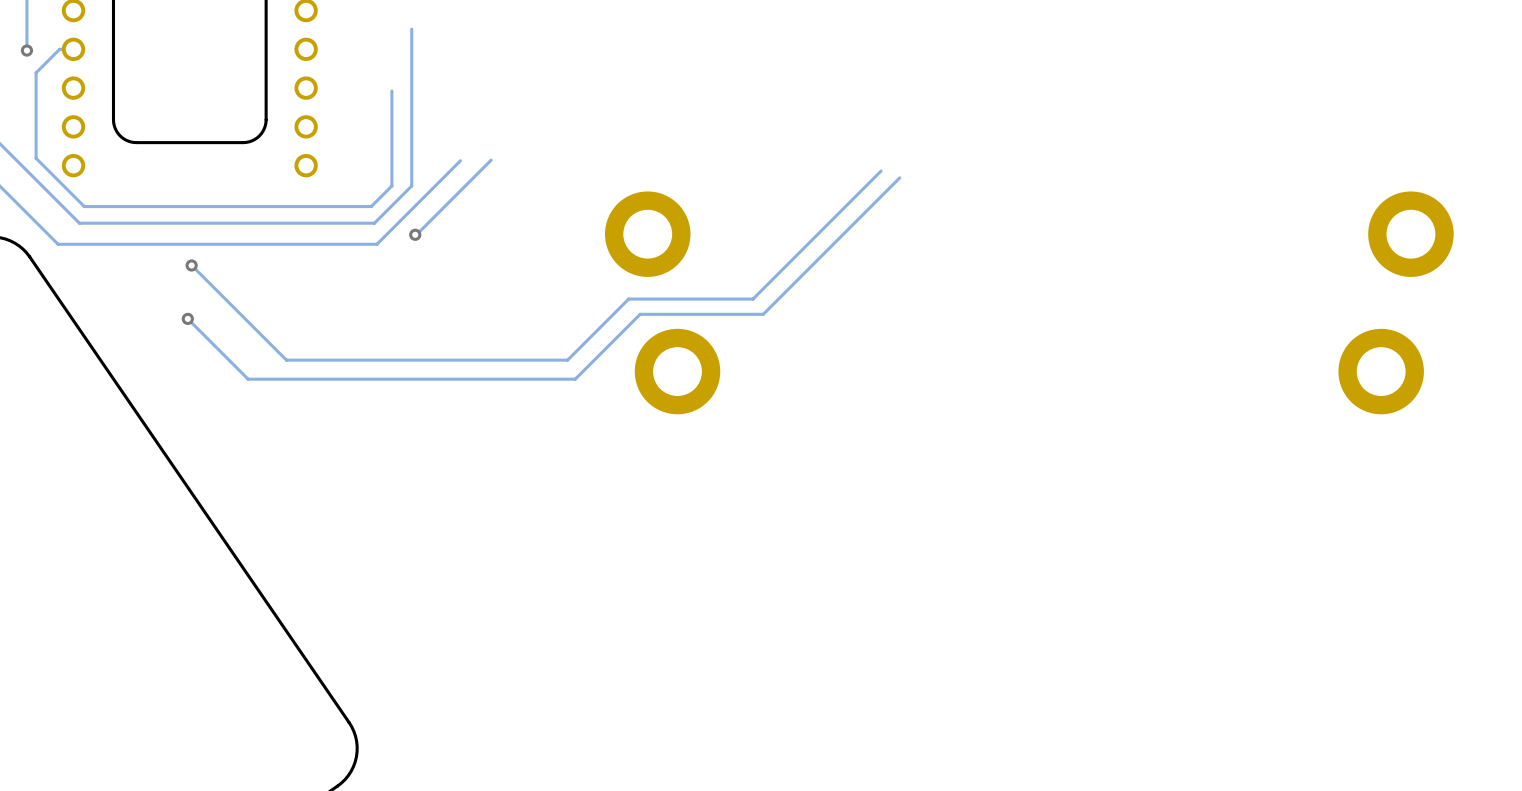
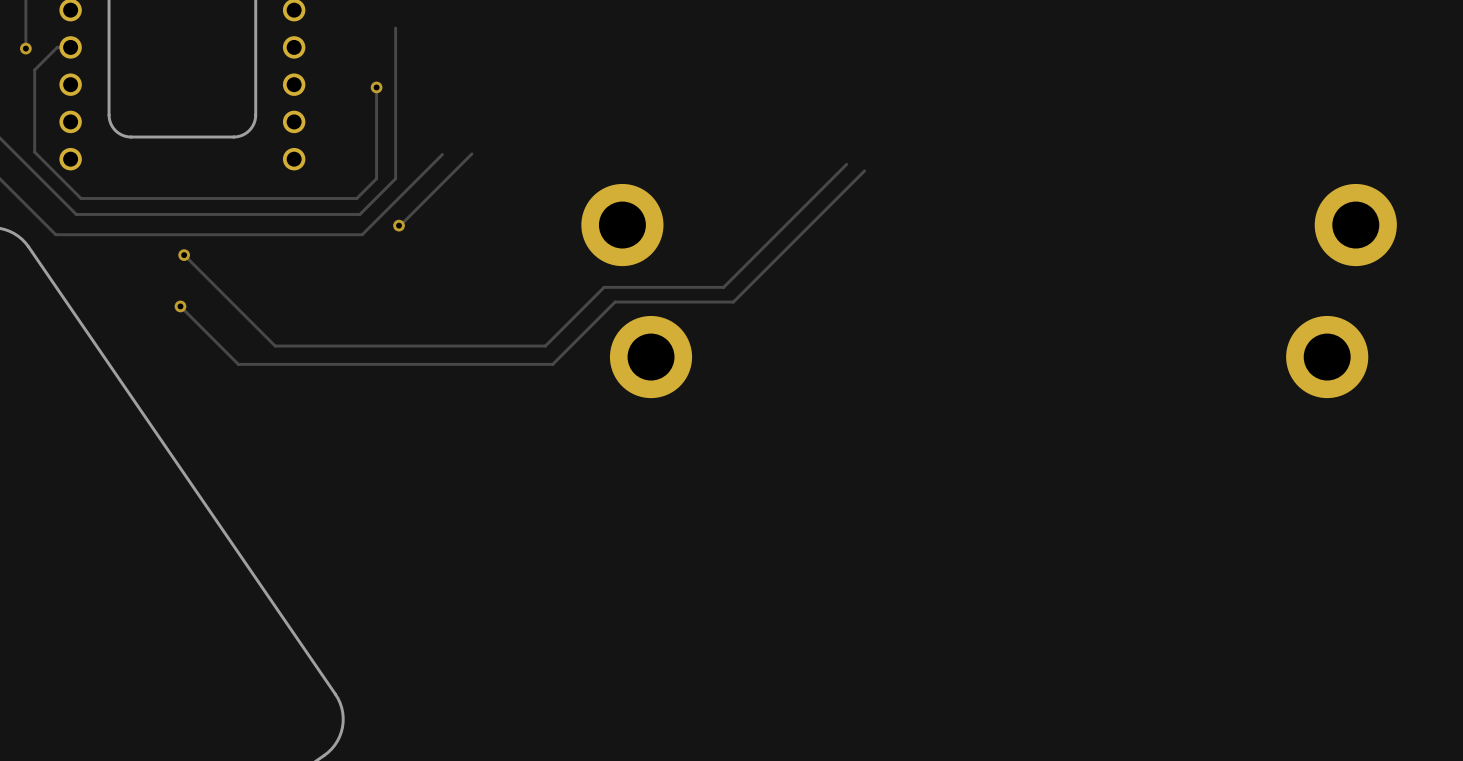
via: none -> (376, 87)

